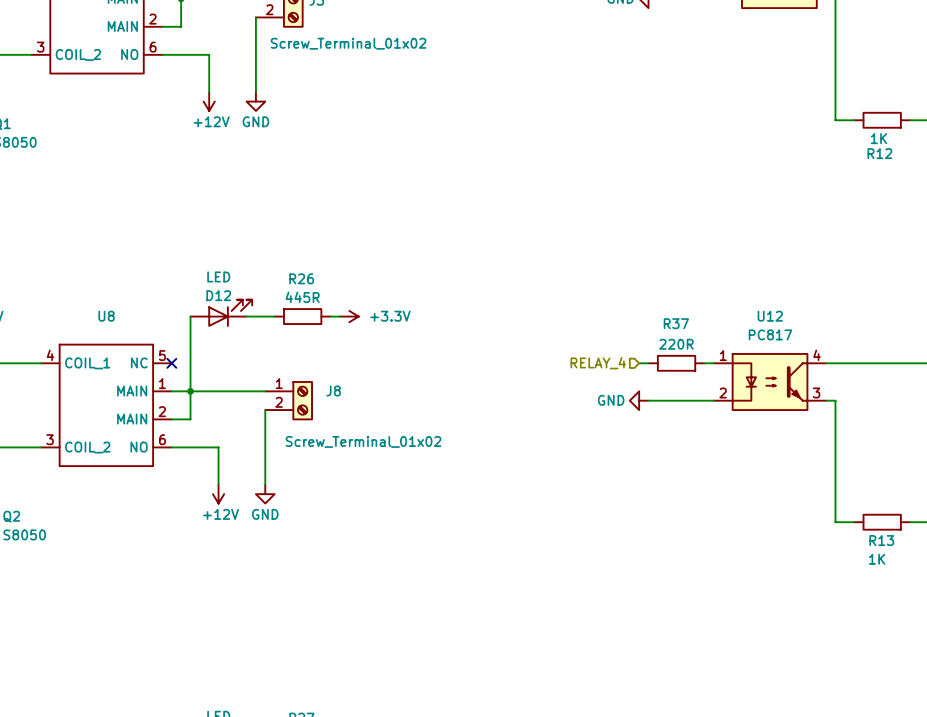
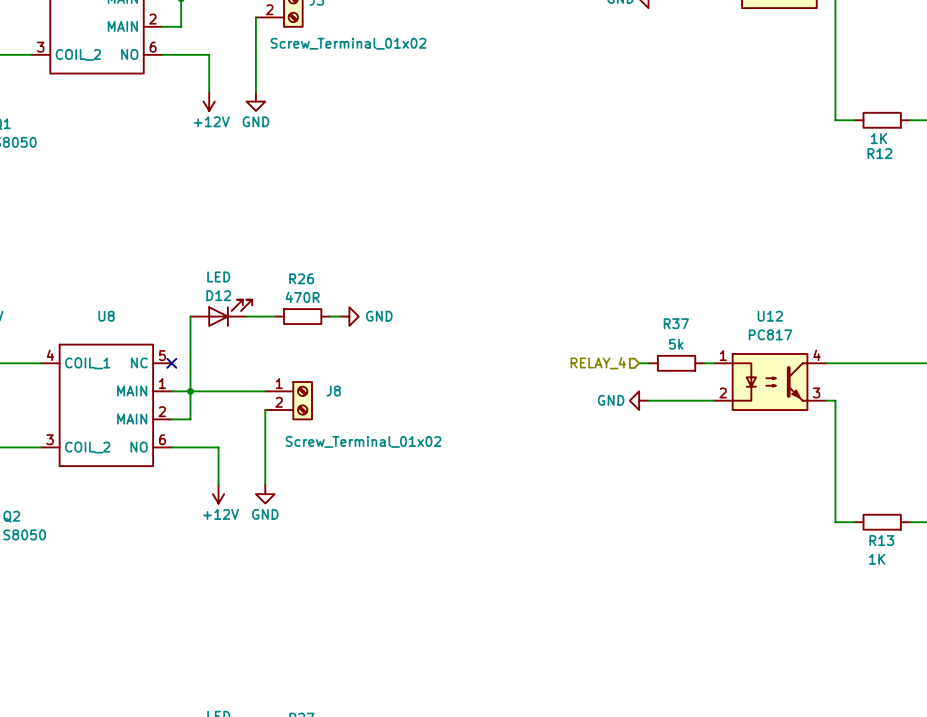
R26 value: 445R (302, 297) -> 470R (302, 297)
power symbol: +3.3V (349, 316) -> GND (349, 316)
R37 value: 220R (676, 344) -> 5k (676, 344)

